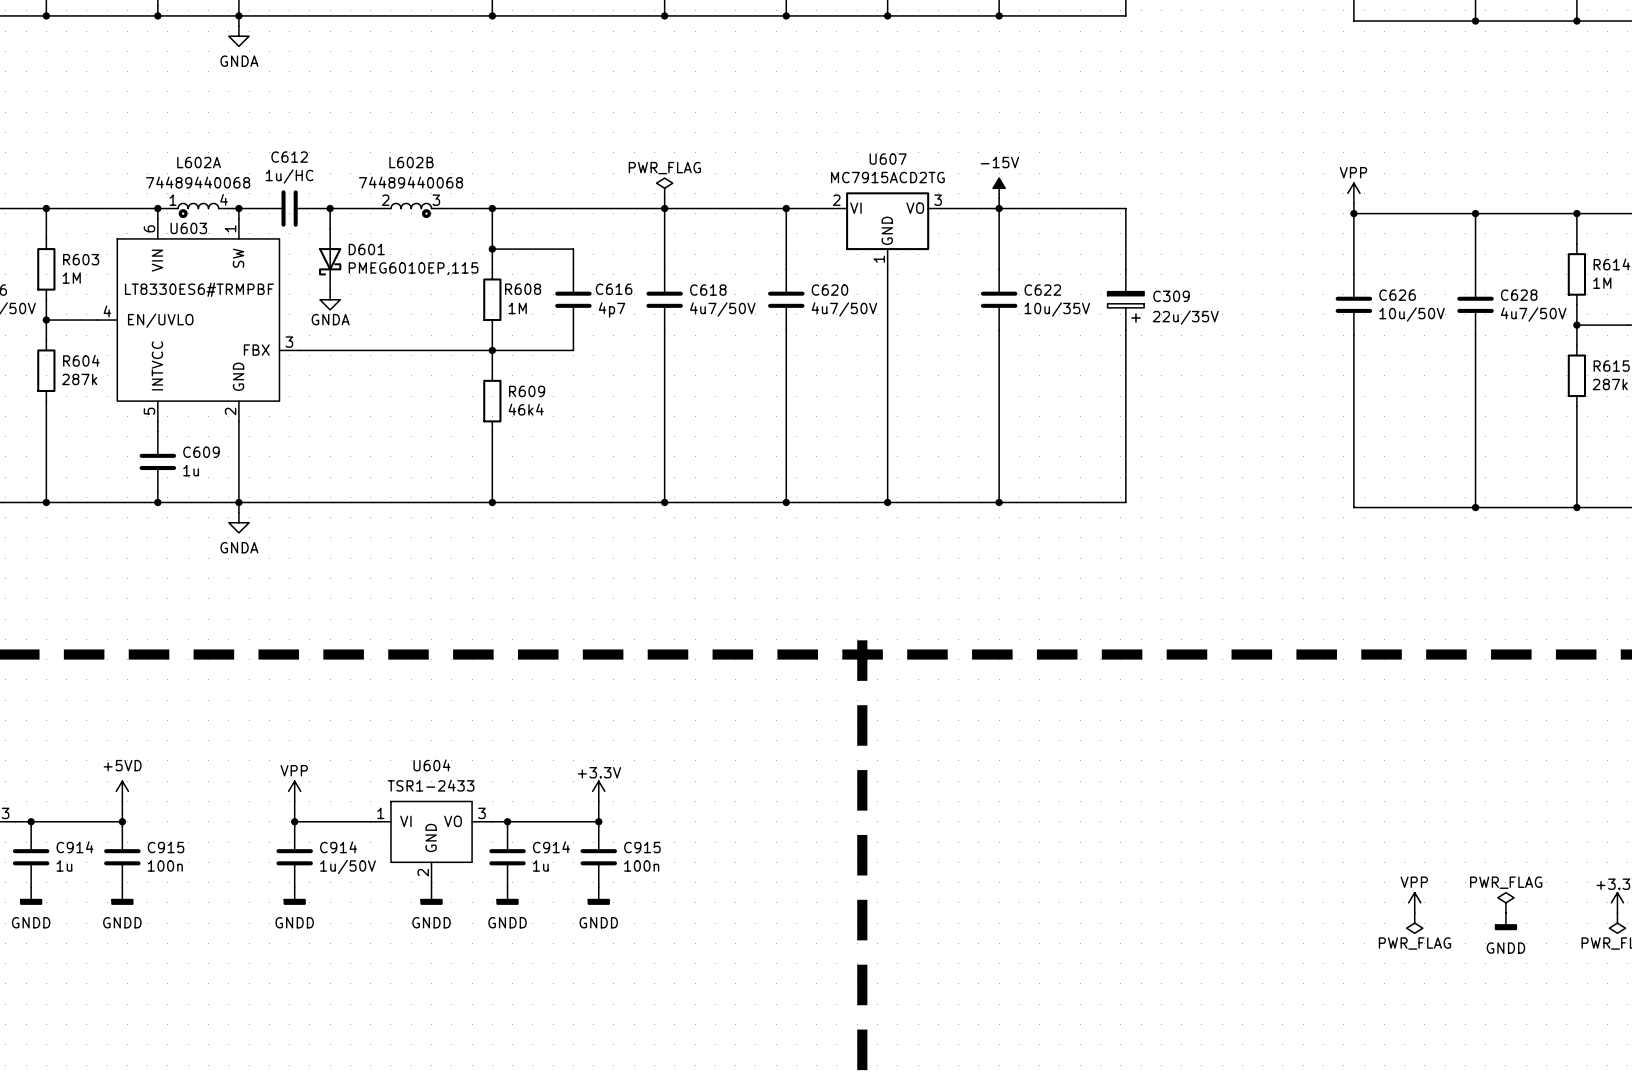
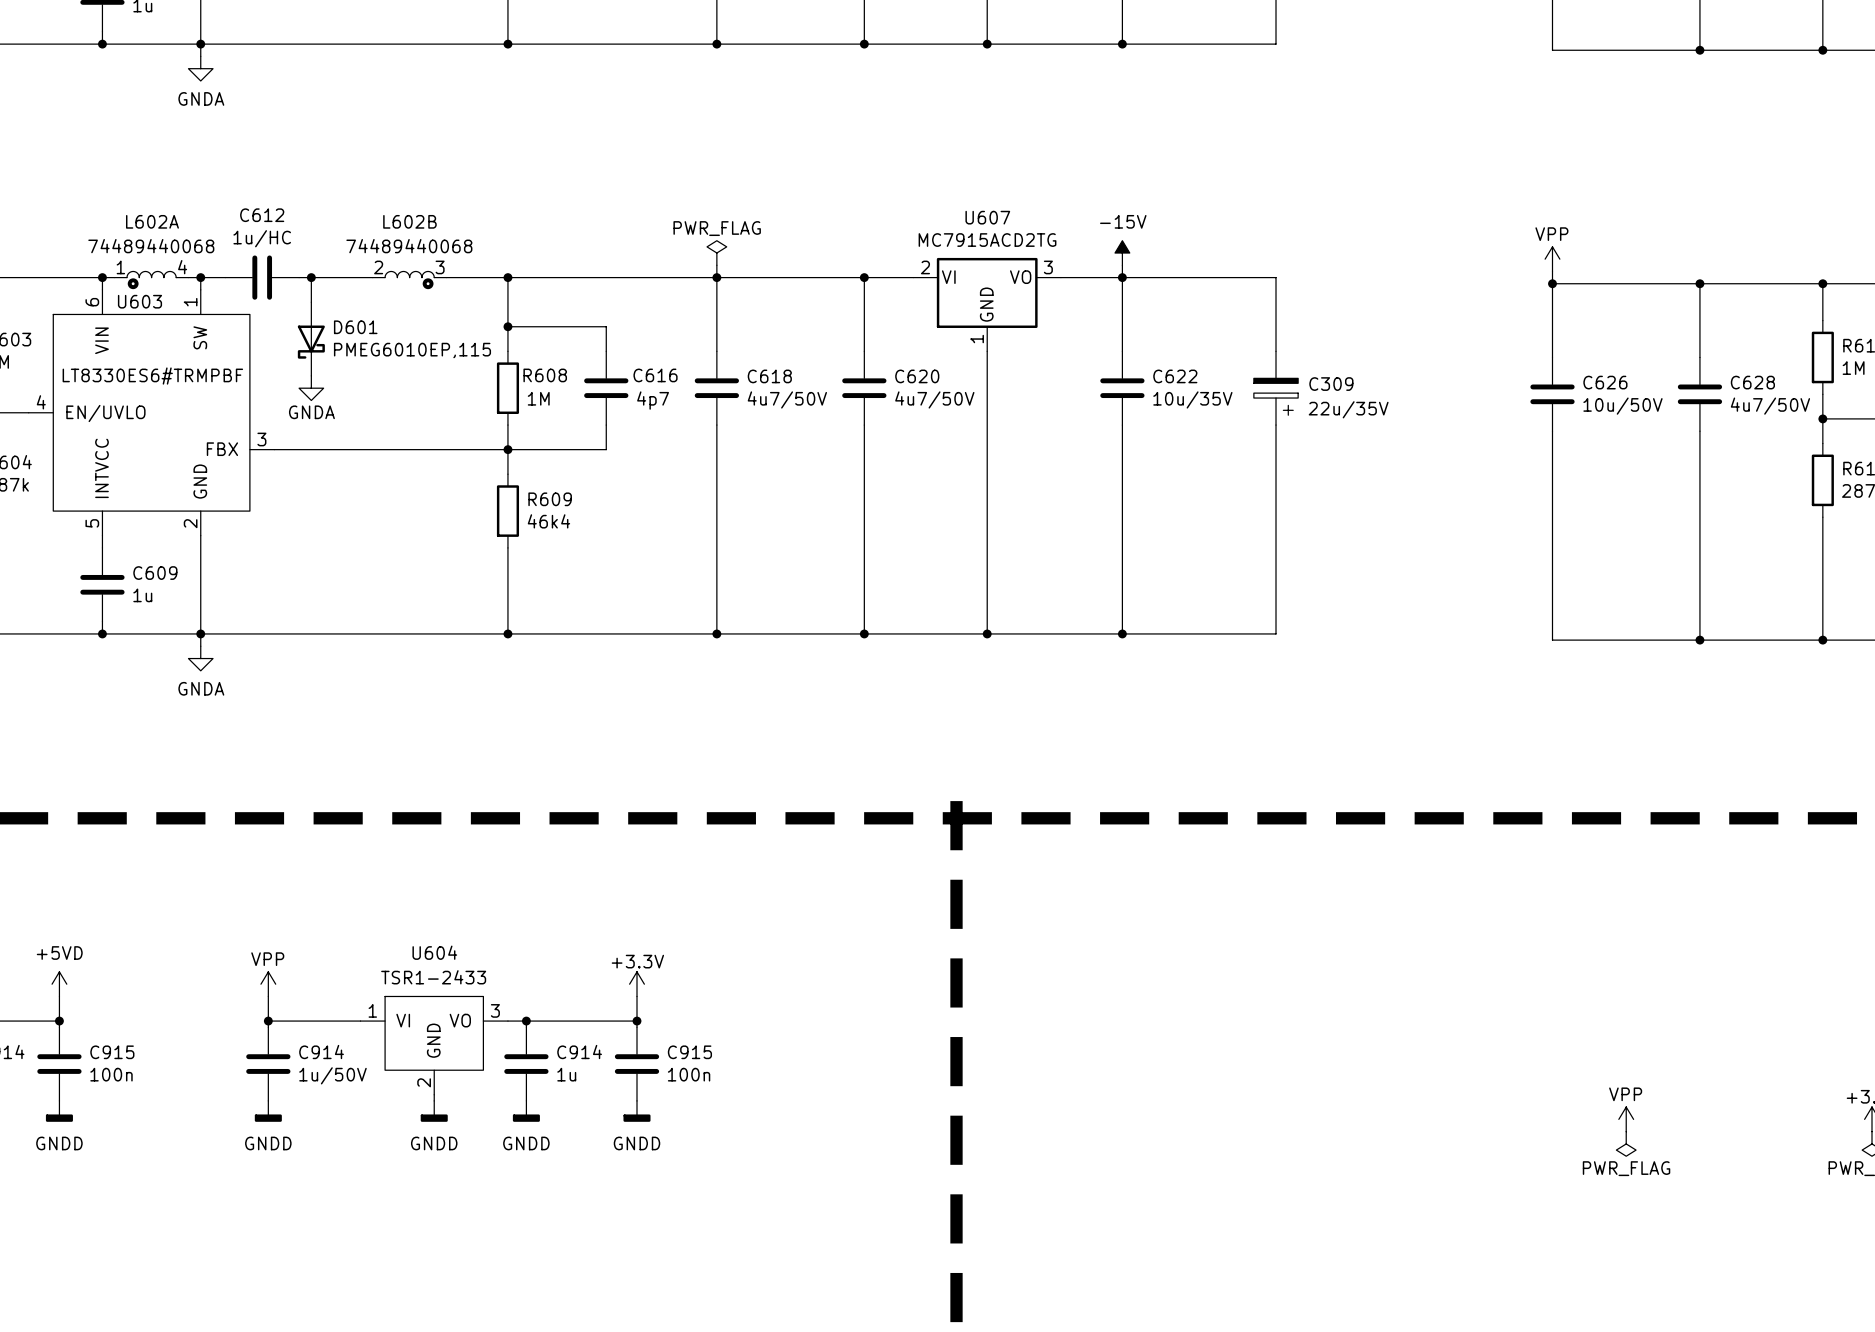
power symbol: PWR_FLAG (1505, 902) -> none
power symbol: GNDD (1505, 921) -> none

